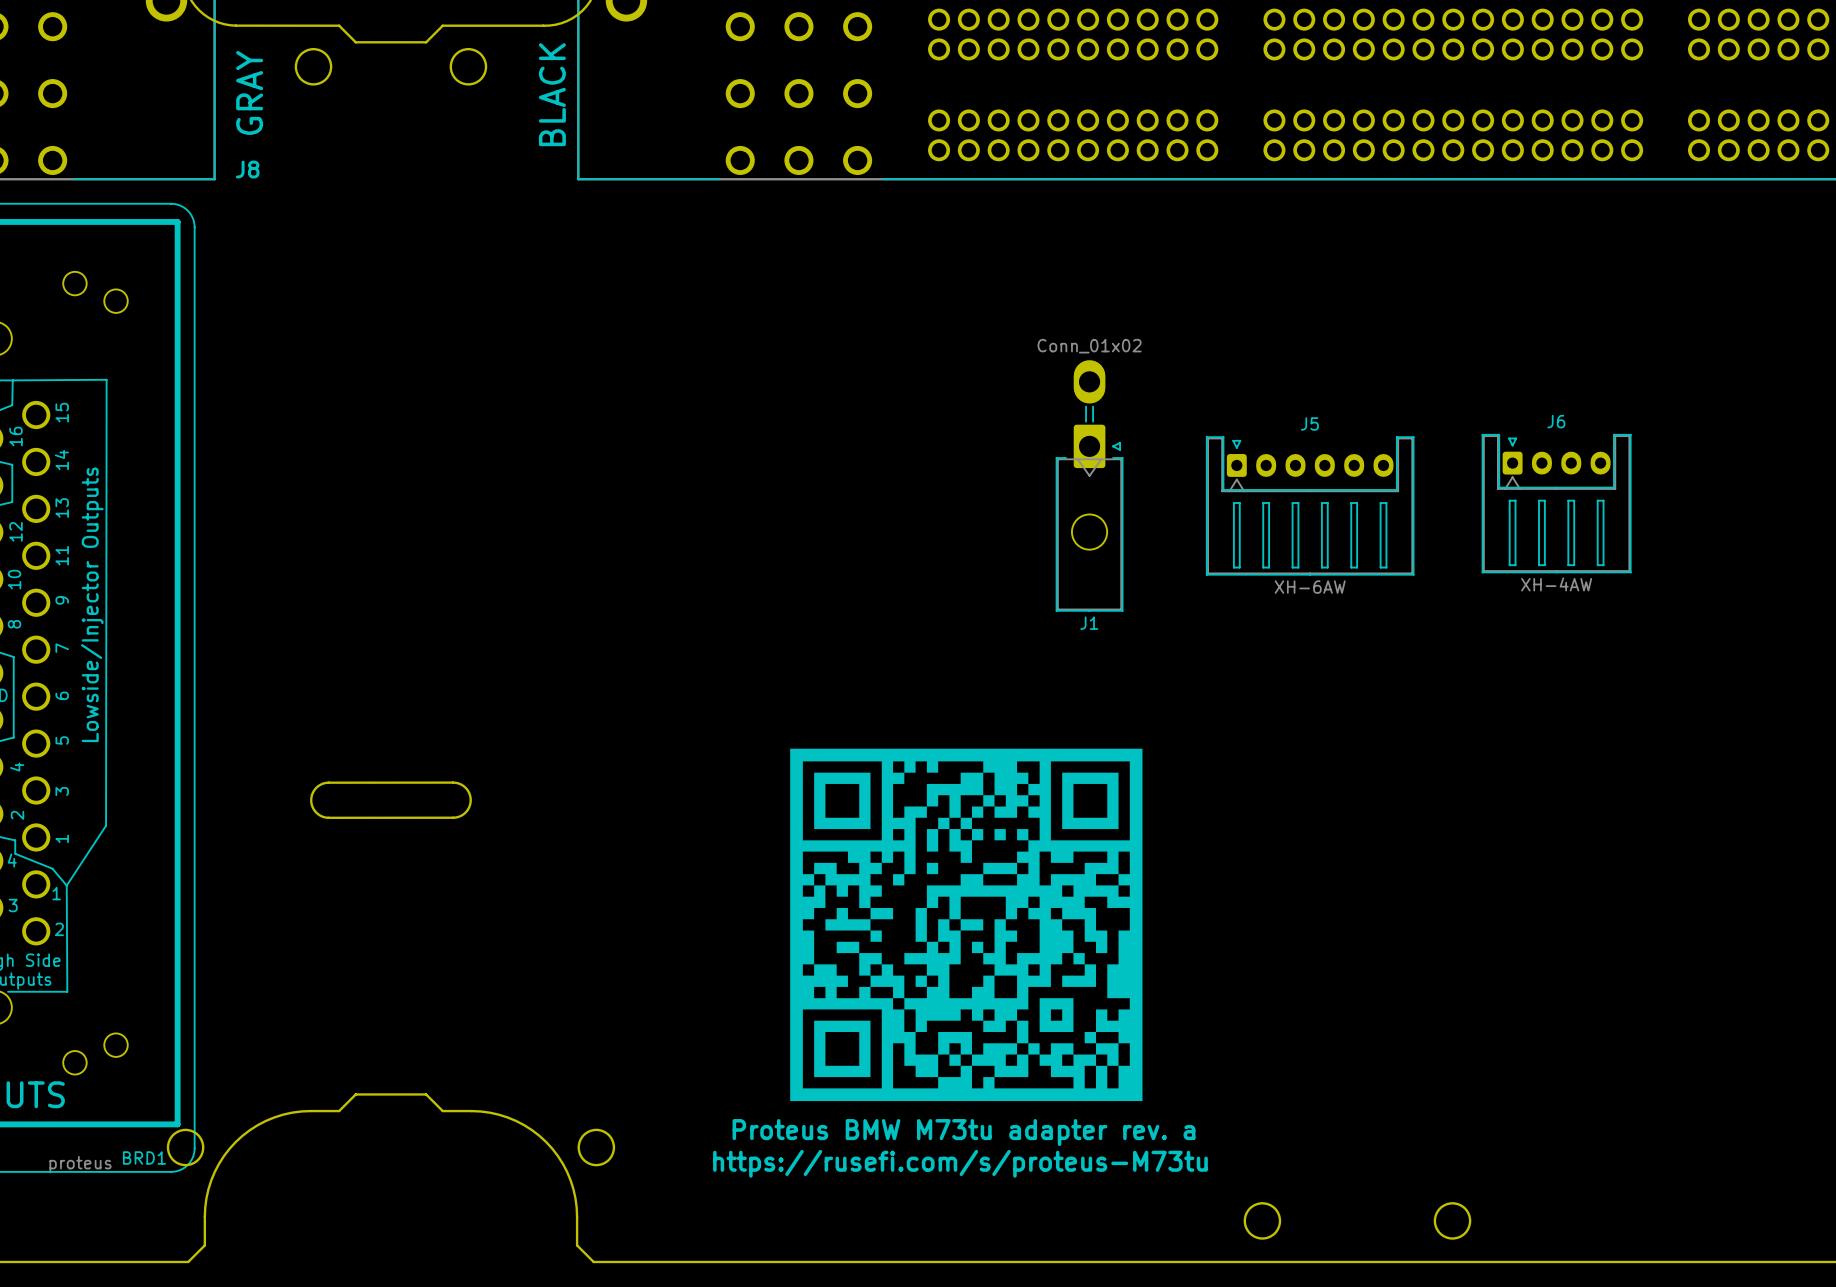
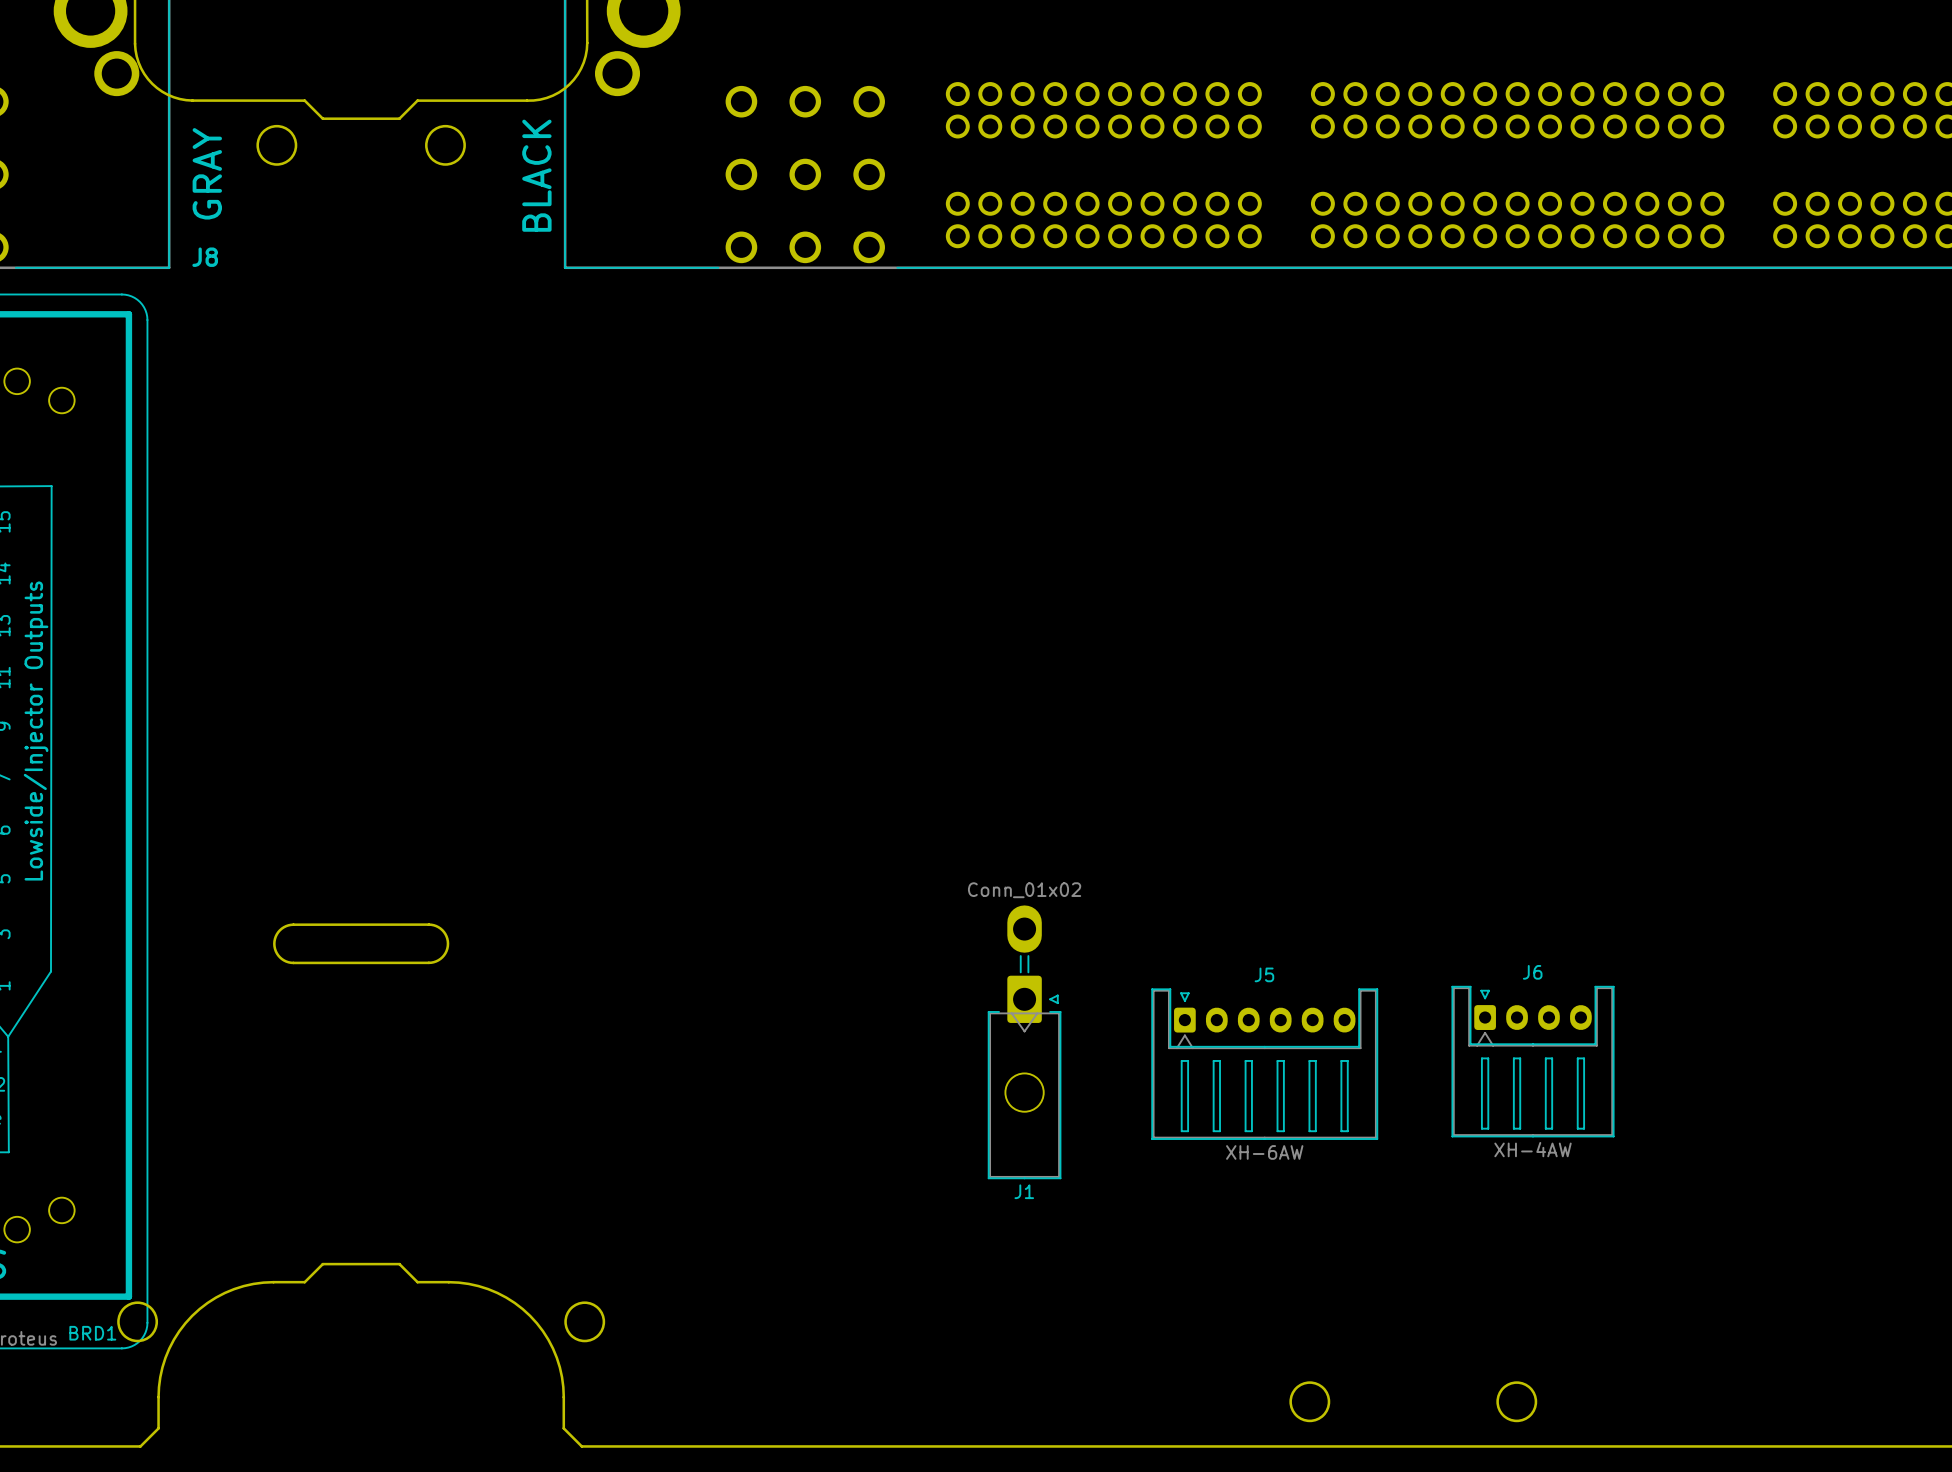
J1 position: (1089, 485) -> (1024, 1042)
J6 position: (1556, 503) -> (1533, 1061)
J5 position: (1310, 505) -> (1264, 1064)
drawing: [790, 748, 1143, 1102] -> none
text: Proteus BMW M73tu adapter rev. a (963, 1132) -> none
text: https://rusefi.com/s/proteus-M73tu (960, 1163) -> none

